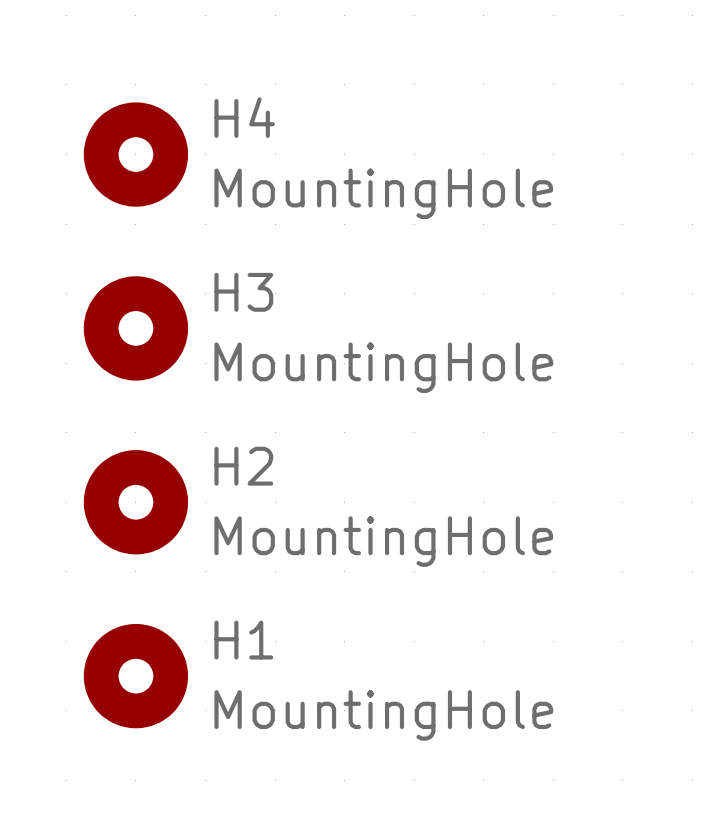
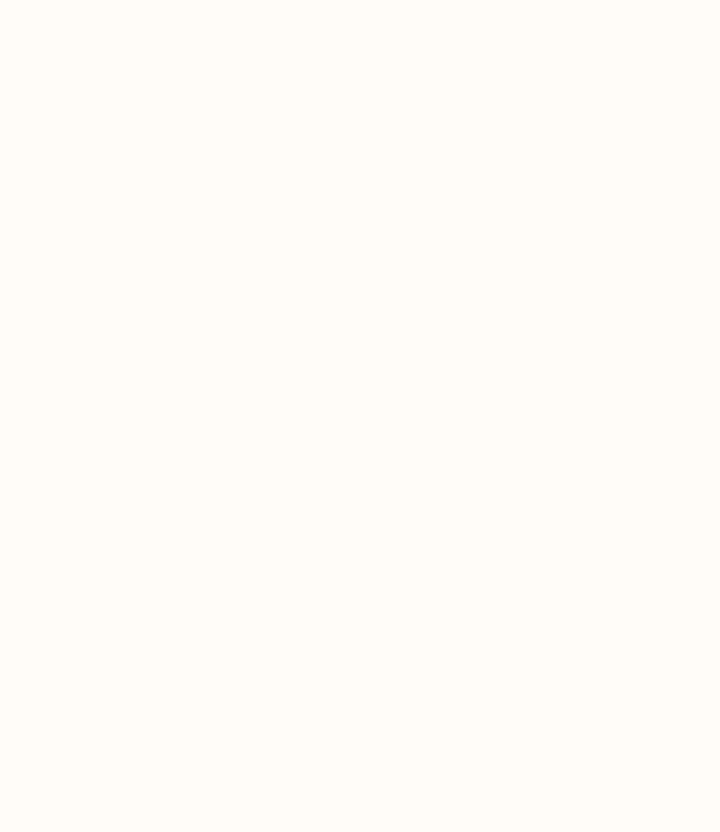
H4: MountingHole (135, 154) -> none
H3: MountingHole (135, 328) -> none
H2: MountingHole (135, 502) -> none
H1: MountingHole (135, 676) -> none

